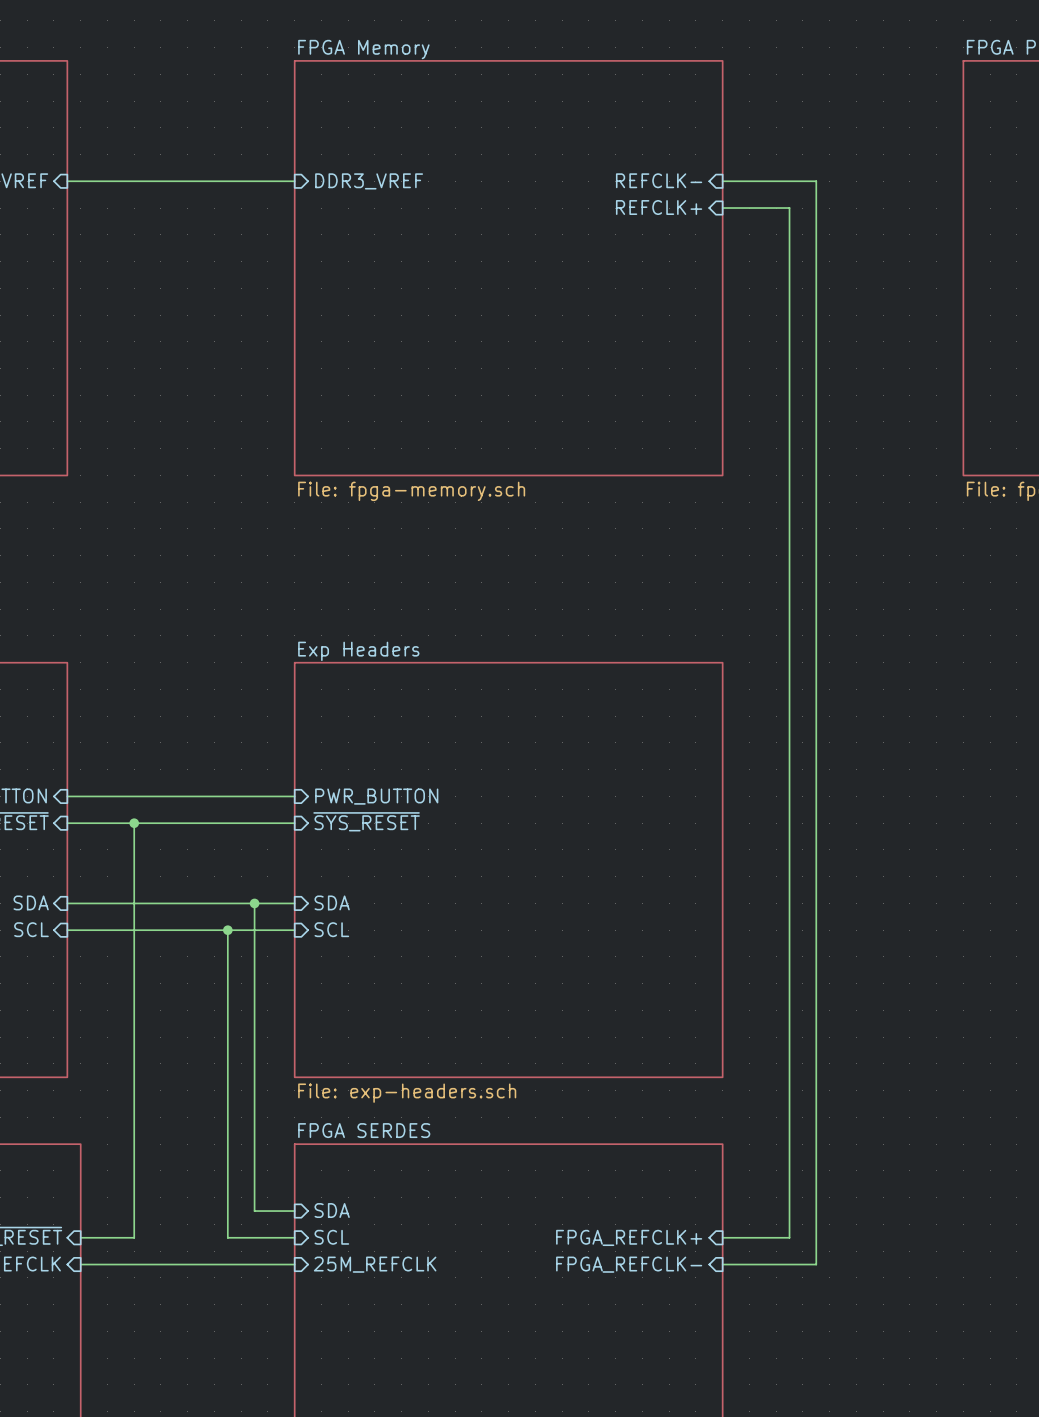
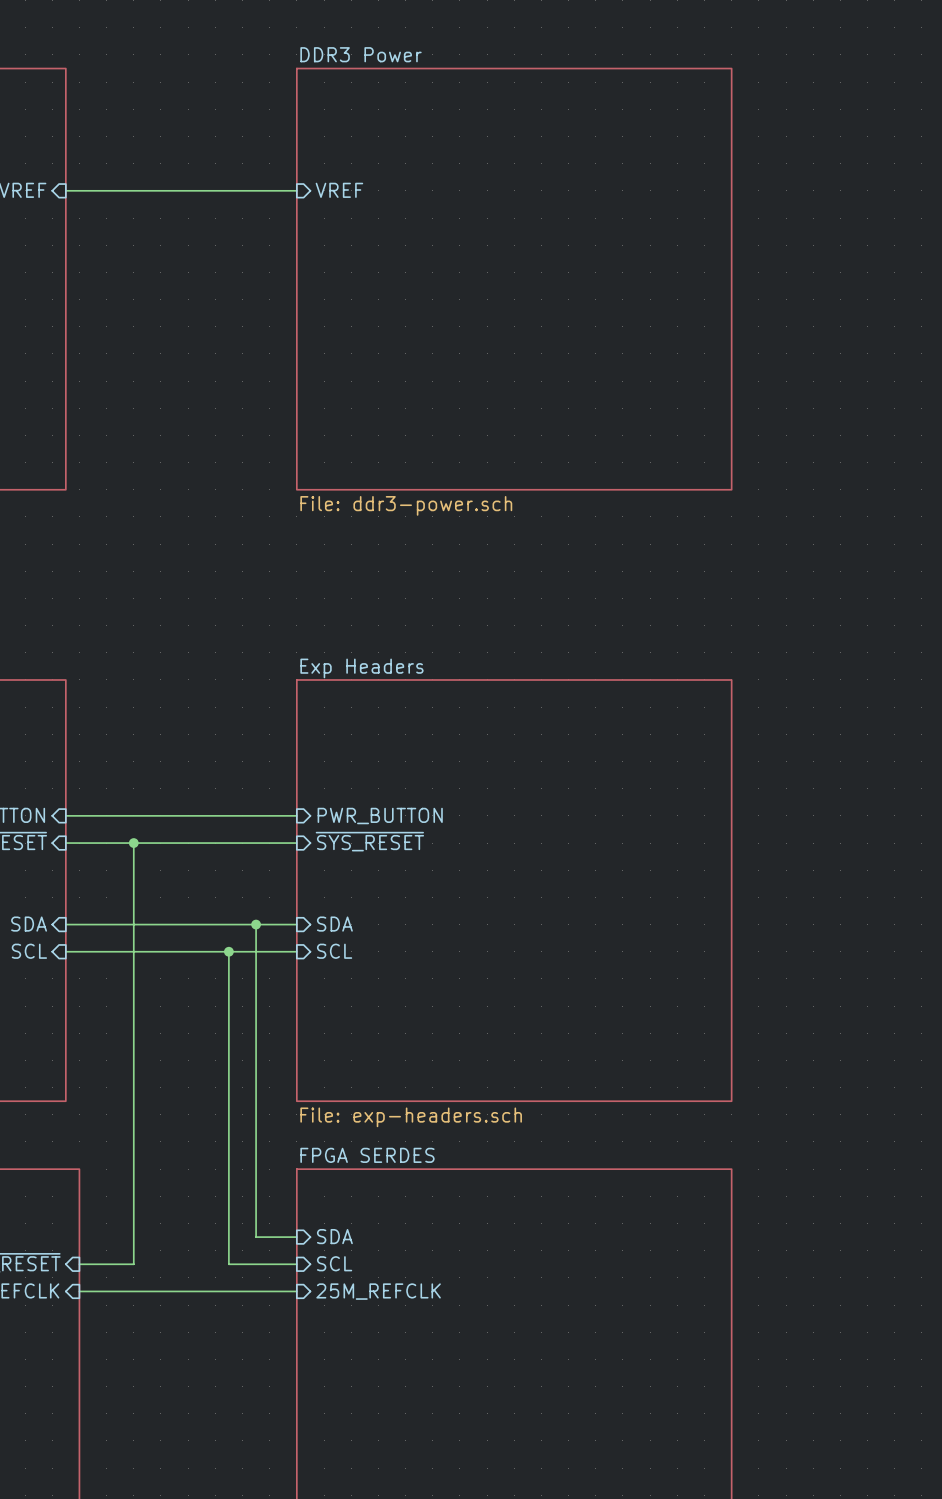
sheet FPGA Memory name: FPGA Memory (363, 49) -> DDR3 Power (361, 54)
sheet pin: REFCLK- (659, 180) -> none
sheet pin: DDR3_VREF (369, 181) -> VREF (339, 190)
wire: (722, 181) (816, 181) (816, 1264) (722, 1264) -> none
sheet pin: REFCLK+ (659, 207) -> none
wire: (722, 208) (789, 208) (789, 1237) (722, 1237) -> none
sheet FPGA Memory value: File: fpga-memory.sch (411, 491) -> File: ddr3-power.sch (406, 505)
sheet pin: FPGA_REFCLK+ (629, 1237) -> none
sheet pin: FPGA_REFCLK- (629, 1264) -> none

